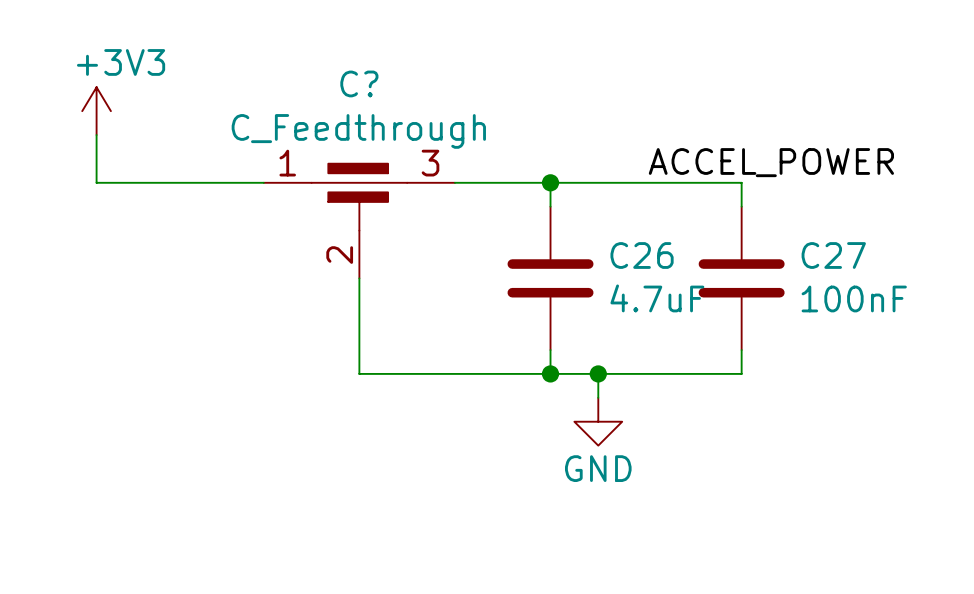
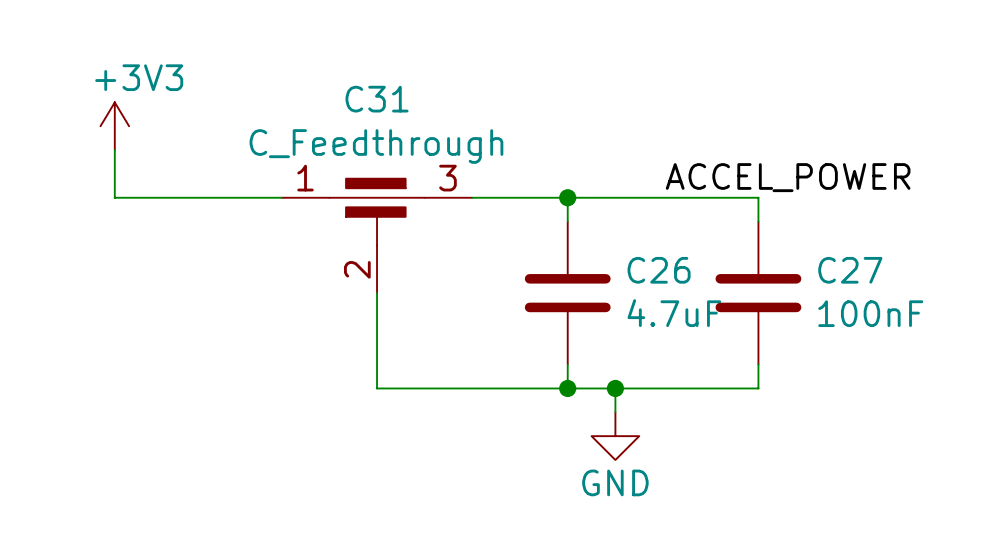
C? name: C? (359, 83) -> C31 (377, 99)

